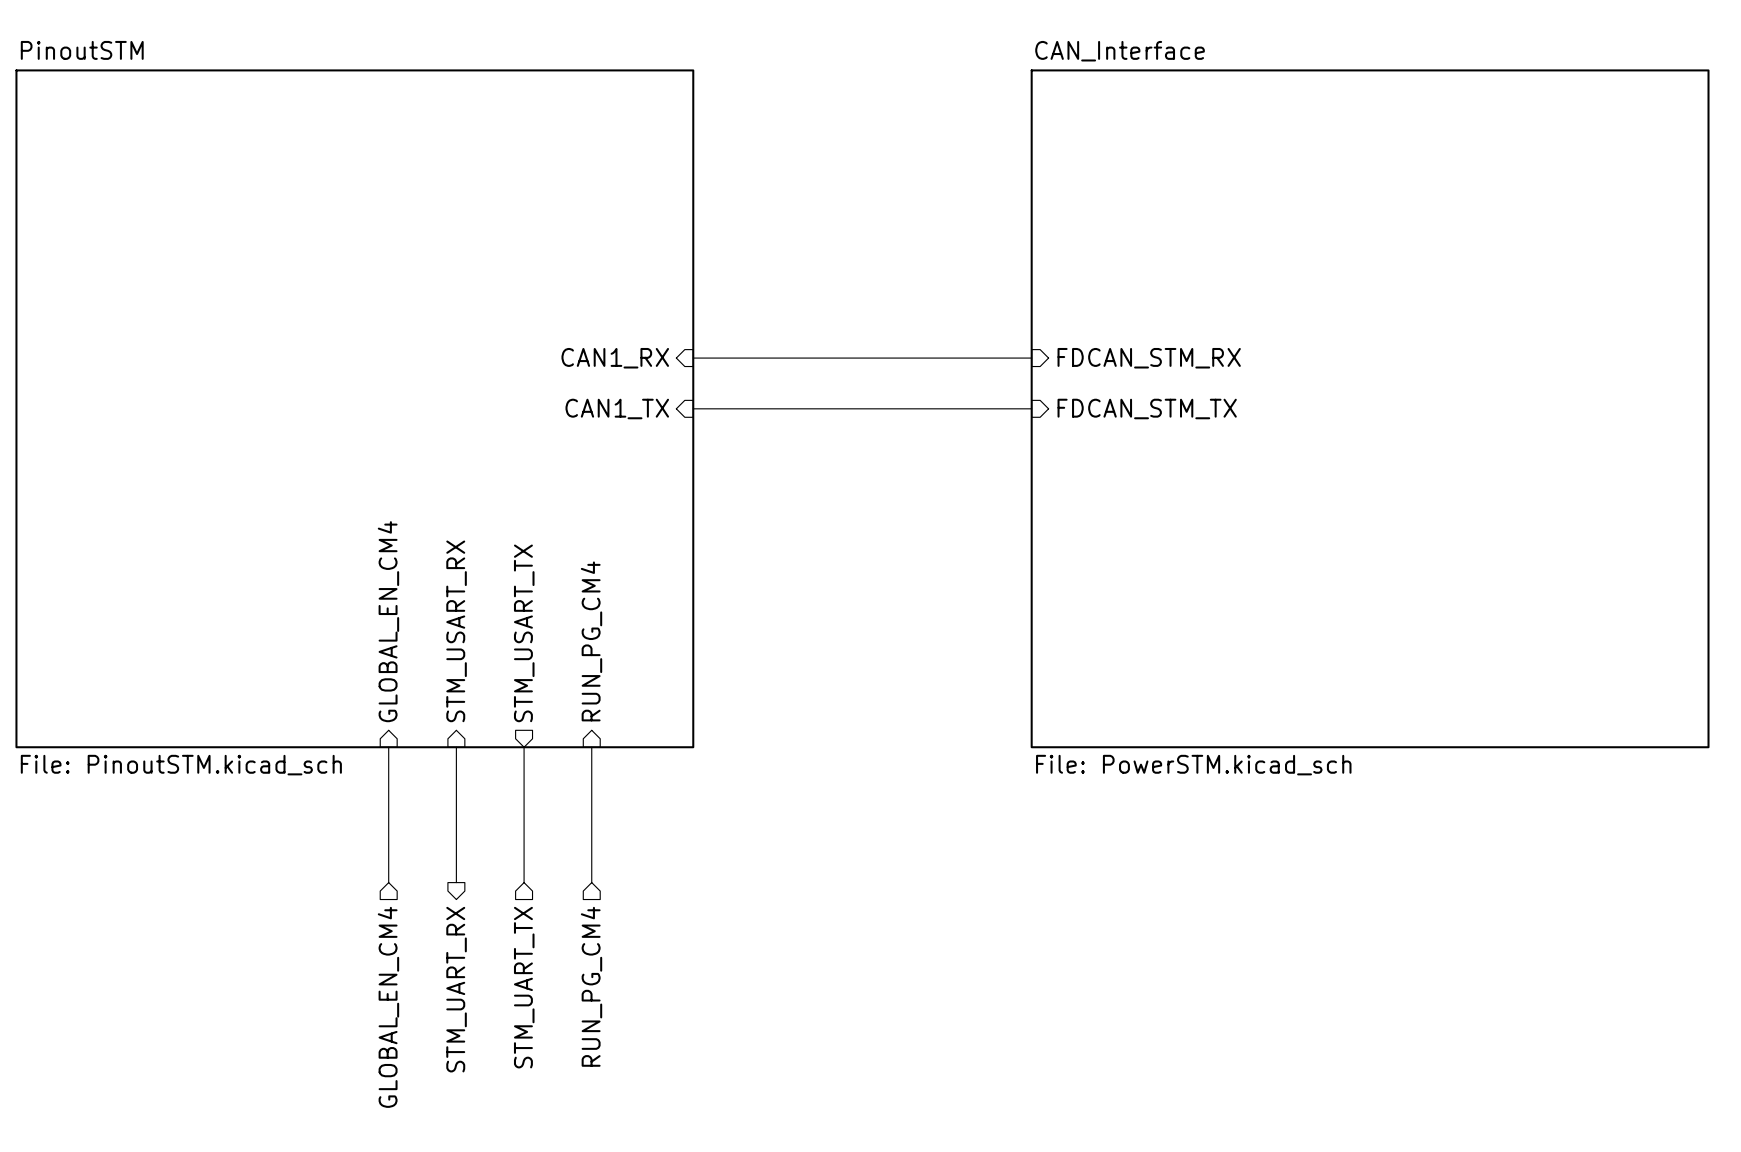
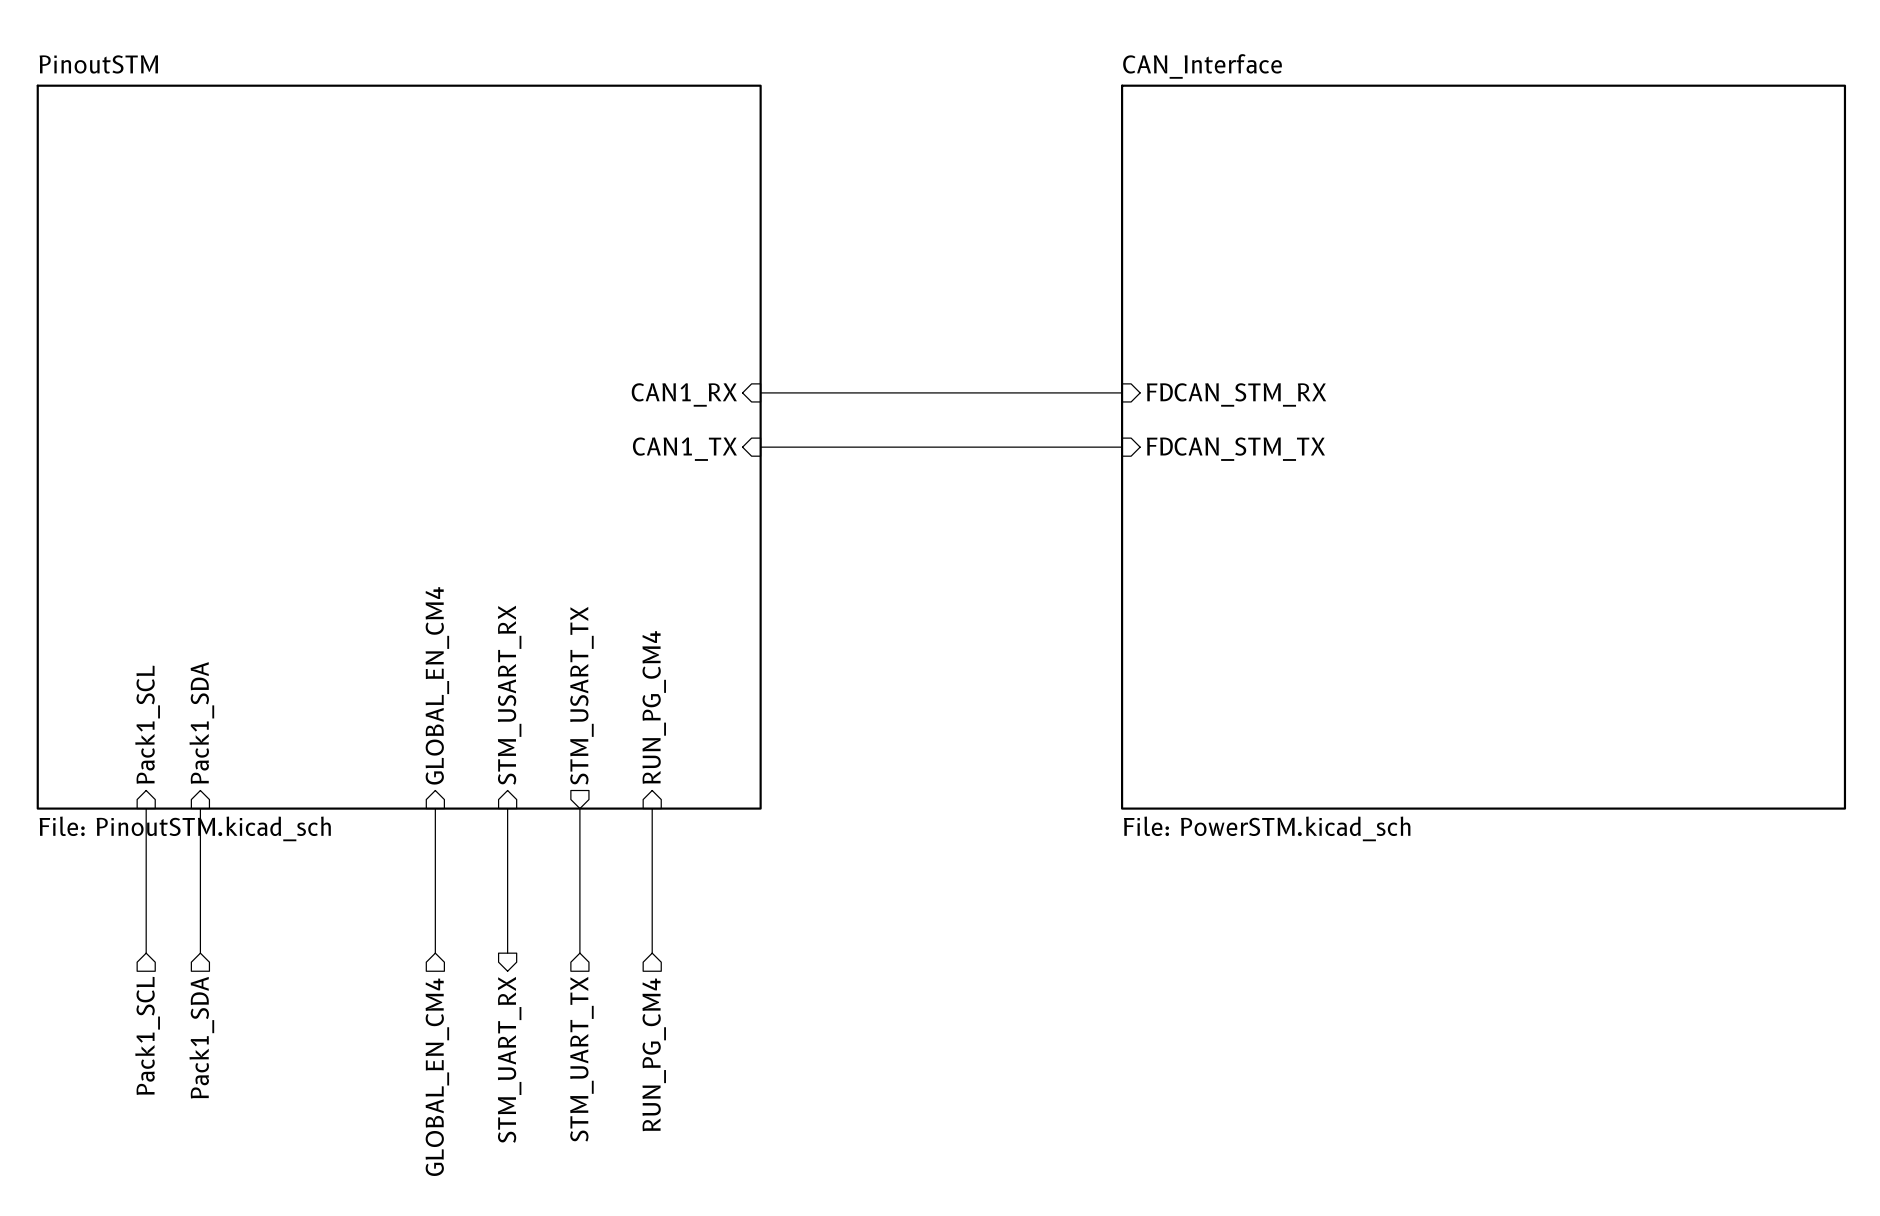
sheet pin: none -> Pack1_SDA (201, 722)
sheet pin: none -> Pack1_SCL (147, 724)
wire: none -> (146, 808) (146, 953)
wire: none -> (200, 808) (200, 953)
hierarchical label: none -> Pack1_SCL (147, 1035)
hierarchical label: none -> Pack1_SDA (201, 1037)

